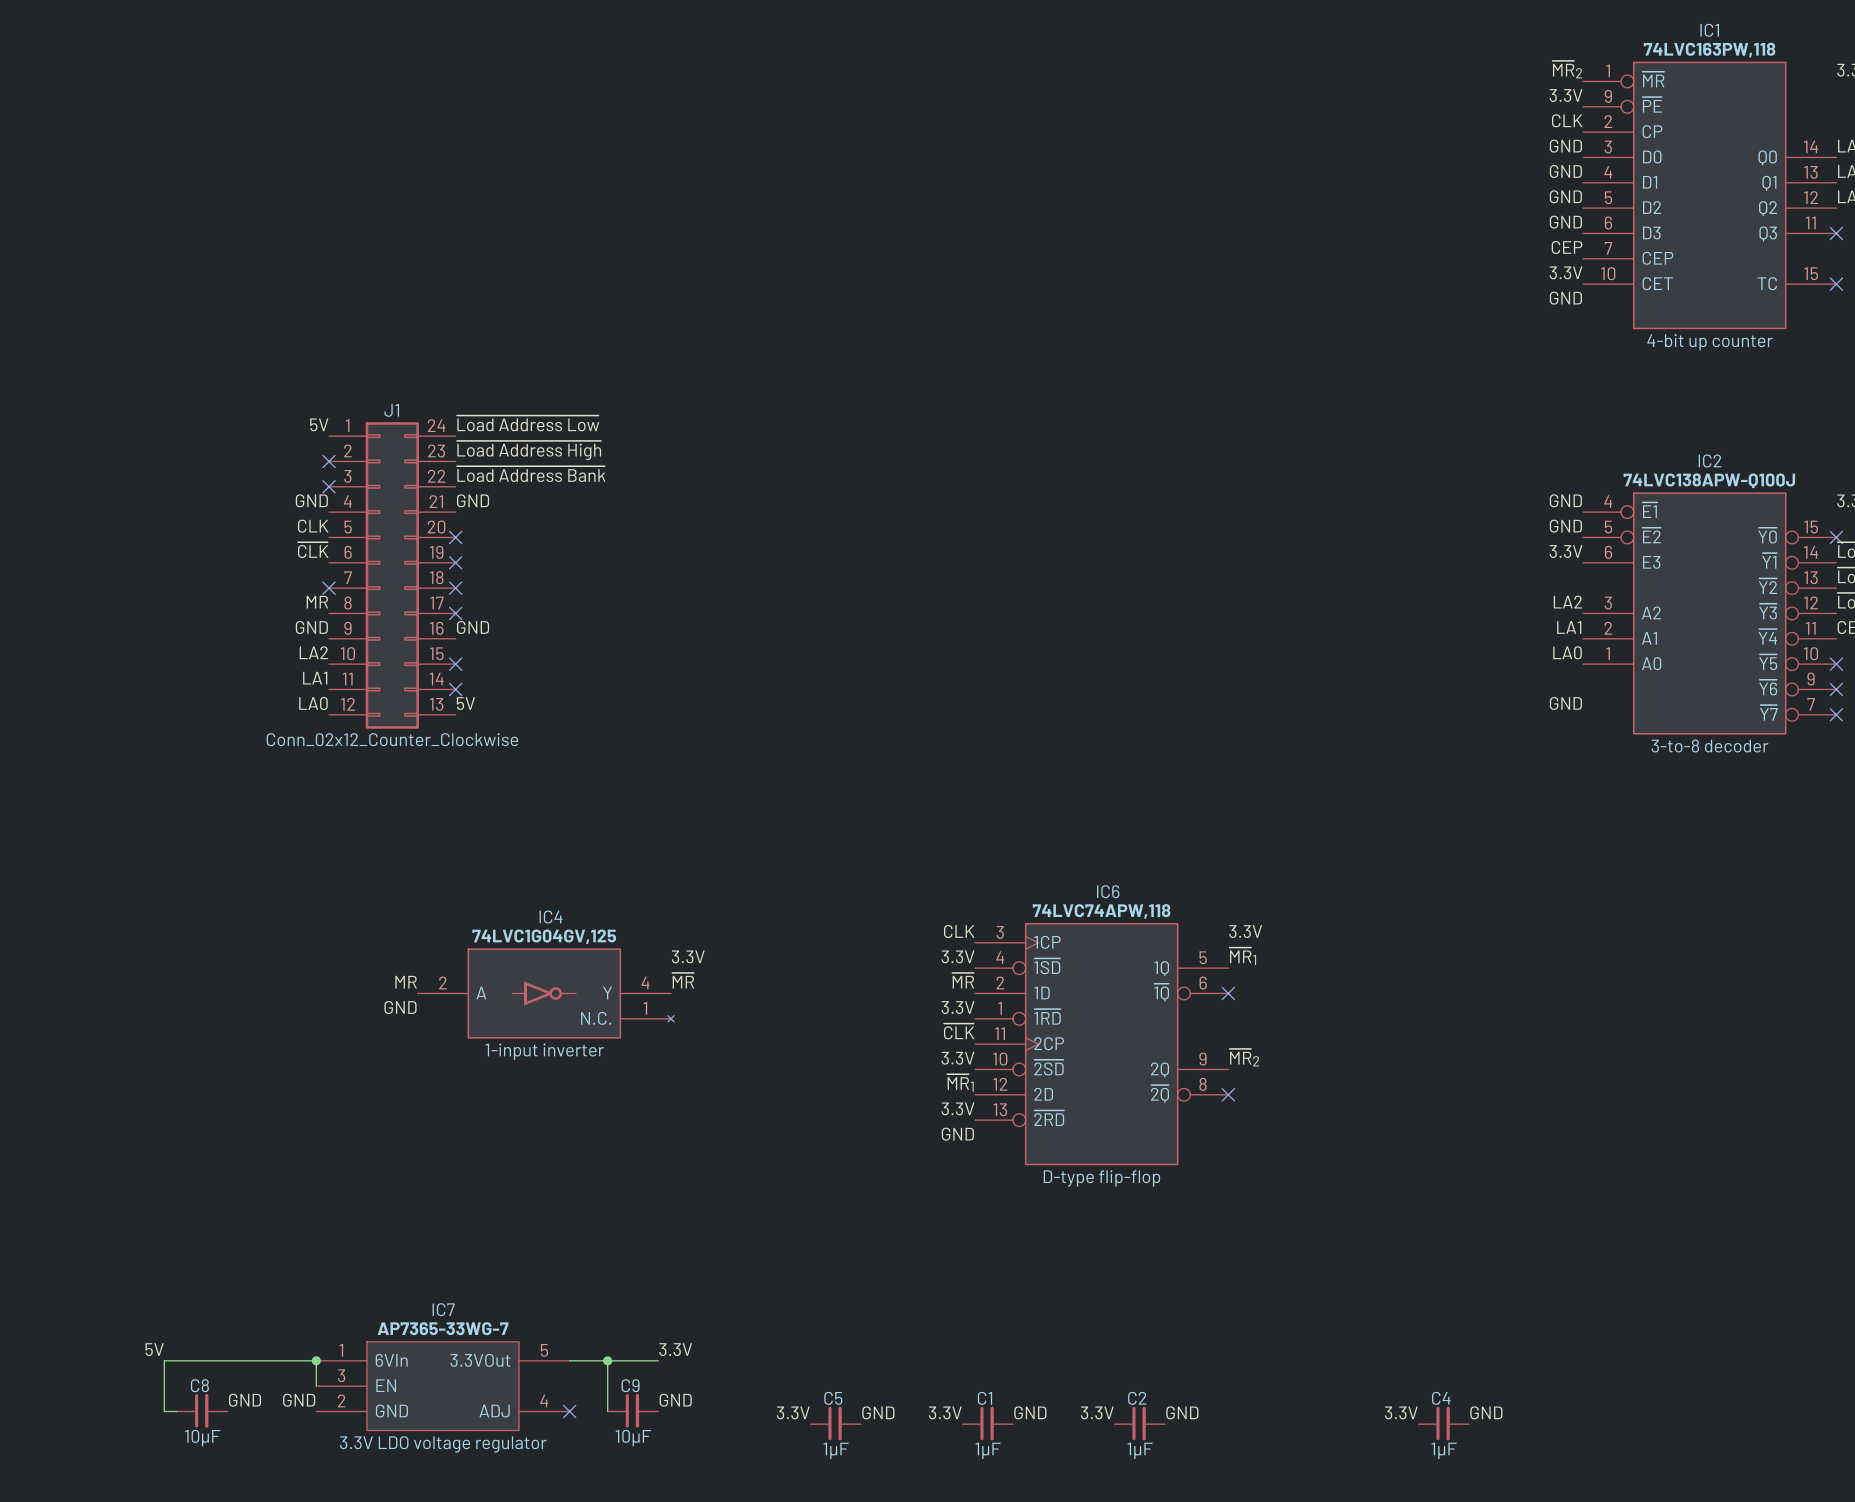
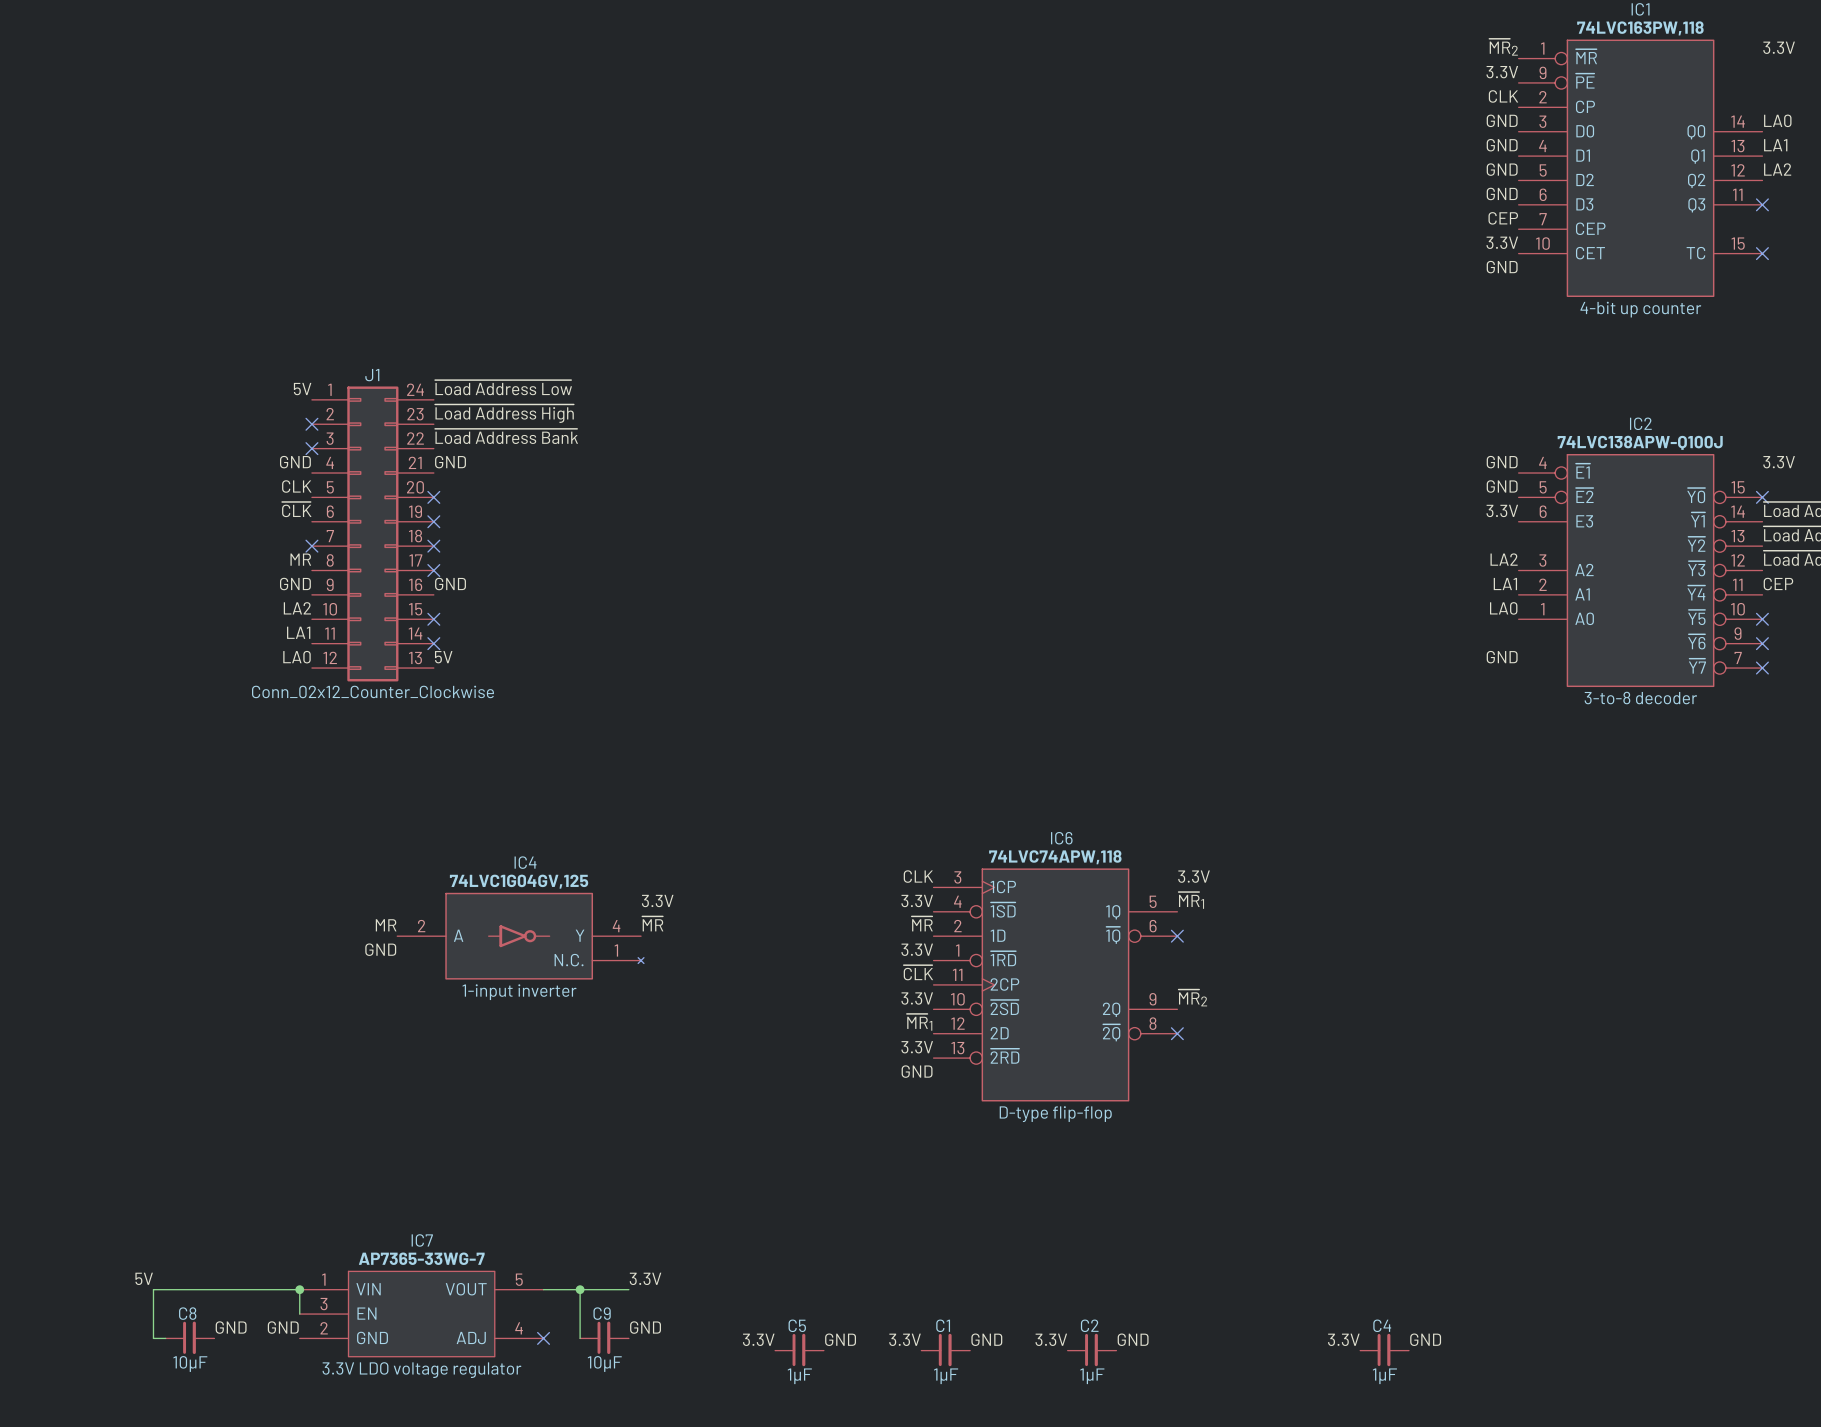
IC7 pin name: 6VIn (391, 1360) -> VIN (368, 1289)
IC7 pin name: 3.3VOut (480, 1360) -> VOUT (466, 1289)

